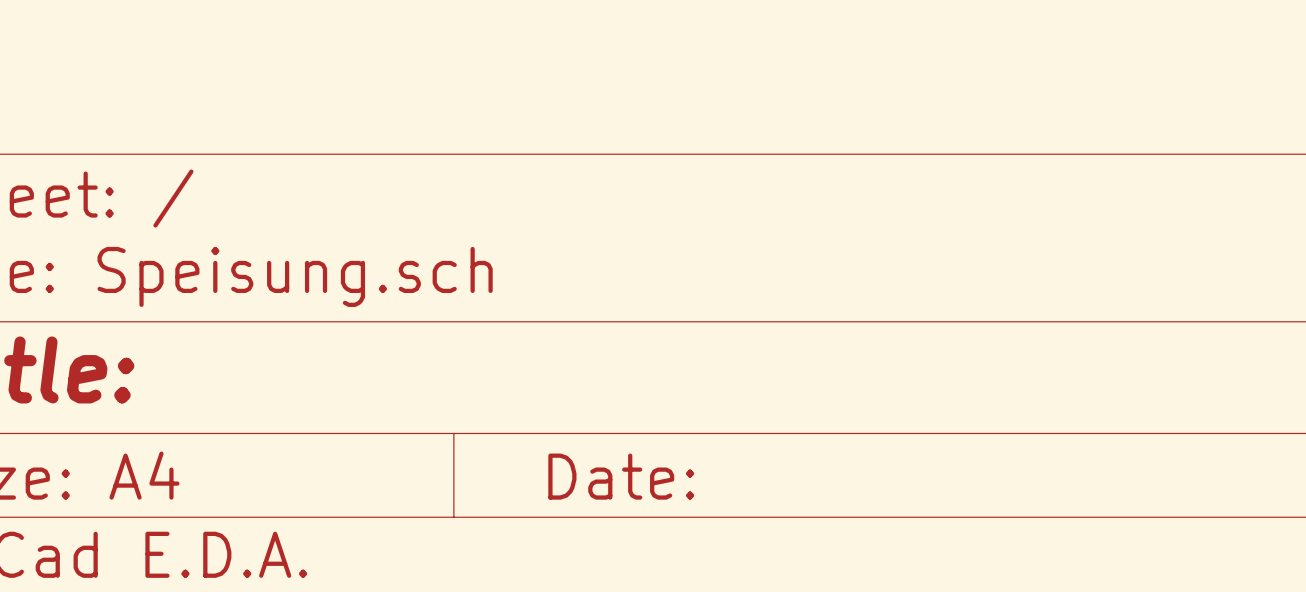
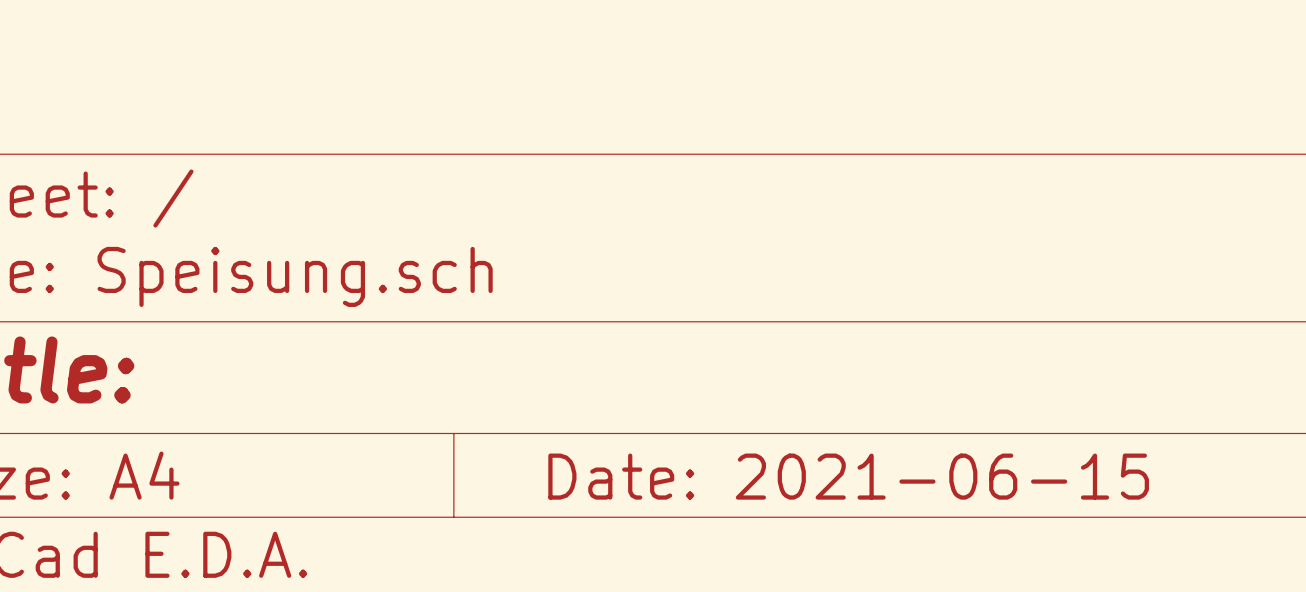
title block: Date: (621, 476) -> Date: 2021-06-15 (848, 476)

